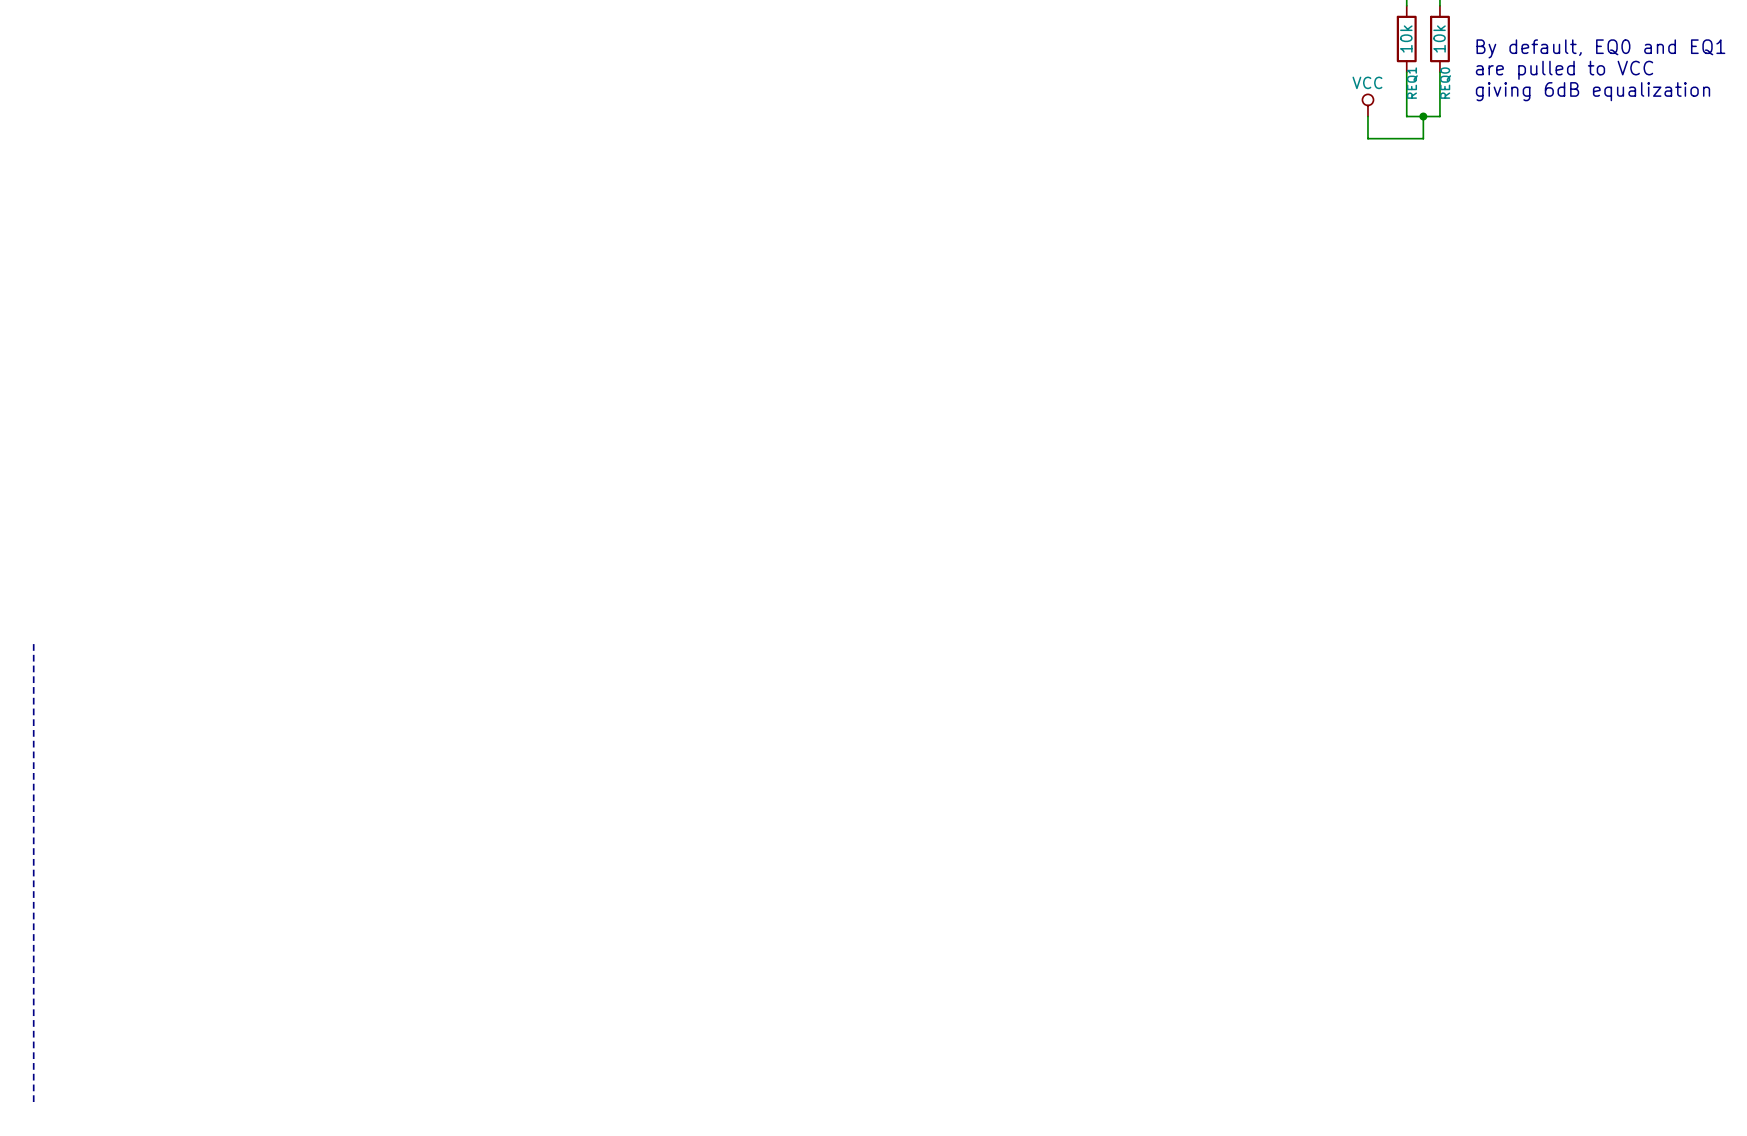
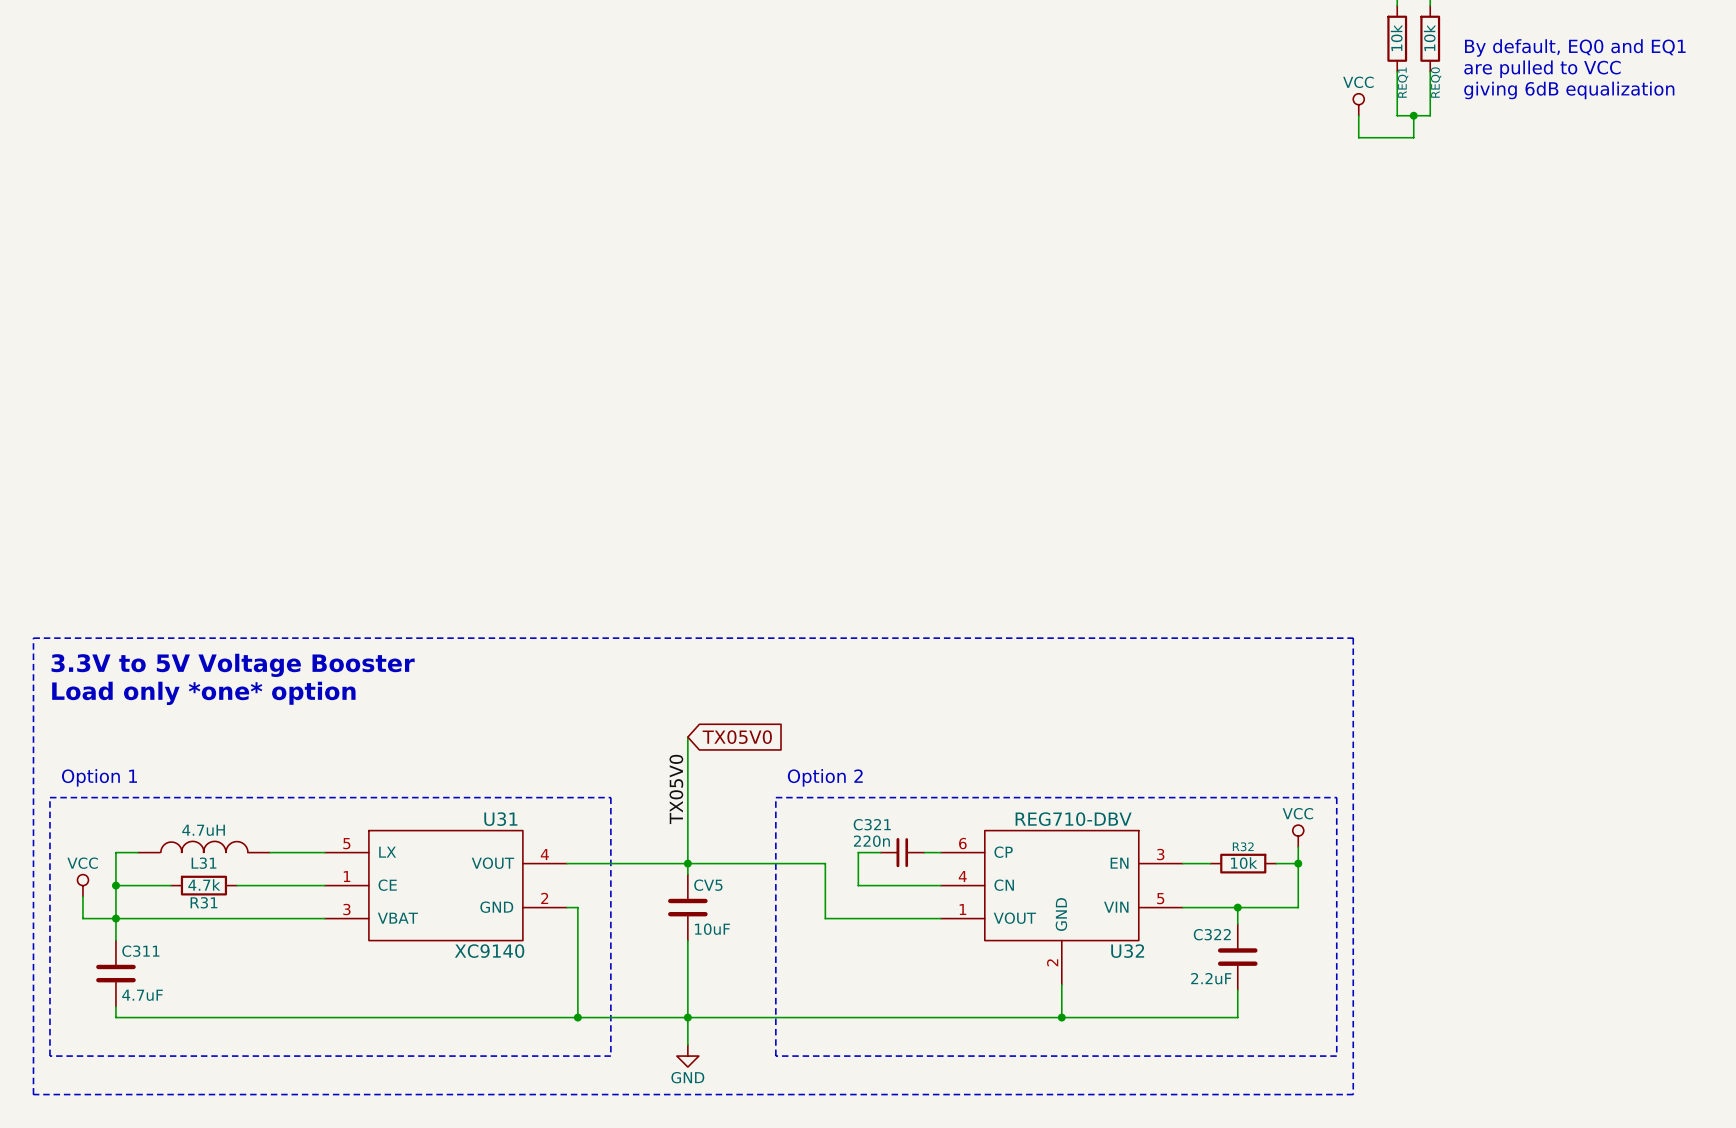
line: none -> (33, 638) (1353, 638) (1353, 1094) (33, 1094)
text: none -> 3.3V to 5V Voltage Booster (233, 665)
text: none -> Load only *one* option (203, 693)
wire: none -> (687, 737) (687, 874)
global label: none -> TX05V0 (737, 737)
text: none -> Option 1 (99, 777)
text: none -> Option 2 (825, 777)
label: none -> TX05V0 (676, 789)
line: none -> (49, 797) (610, 797) (610, 1056) (49, 1056) (49, 797)
line: none -> (775, 797) (1336, 797) (1336, 1056) (775, 1056) (775, 797)
power symbol: none -> VCC (1298, 836)
L31: none -> 4.7uH (203, 846)
wire: none -> (1298, 847) (1298, 907) (1182, 907)
wire: none -> (137, 852) (115, 852) (115, 940)
wire: none -> (269, 852) (324, 852)
wire: none -> (880, 852) (858, 852) (858, 885) (940, 885)
C321: none -> 220n (902, 852)
wire: none -> (924, 852) (940, 852)
wire: none -> (566, 863) (825, 863) (825, 918) (940, 918)
junction: none -> (687, 863)
wire: none -> (1182, 863) (1210, 863)
R32: none -> 10k (1243, 863)
wire: none -> (1276, 863) (1298, 863)
junction: none -> (1298, 863)
power symbol: none -> VCC (82, 885)
wire: none -> (115, 885) (170, 885)
junction: none -> (115, 885)
R31: none -> 4.7k (203, 885)
wire: none -> (236, 885) (324, 885)
U31: none -> XC9140 (445, 885)
wire: none -> (82, 896) (82, 918) (324, 918)
wire: none -> (566, 907) (577, 907) (577, 1017)
CV5: none -> 10uF (687, 907)
U32: none -> REG710-DBV (1061, 907)
wire: none -> (1237, 907) (1237, 924)
junction: none -> (1237, 907)
junction: none -> (115, 918)
wire: none -> (687, 940) (687, 1045)
C322: none -> 2.2uF (1237, 957)
C311: none -> 4.7uF (115, 973)
wire: none -> (1061, 984) (1061, 1017)
wire: none -> (1237, 990) (1237, 1017) (115, 1017) (115, 1006)
junction: none -> (577, 1017)
junction: none -> (687, 1017)
junction: none -> (1061, 1017)
power symbol: none -> GND (687, 1056)

